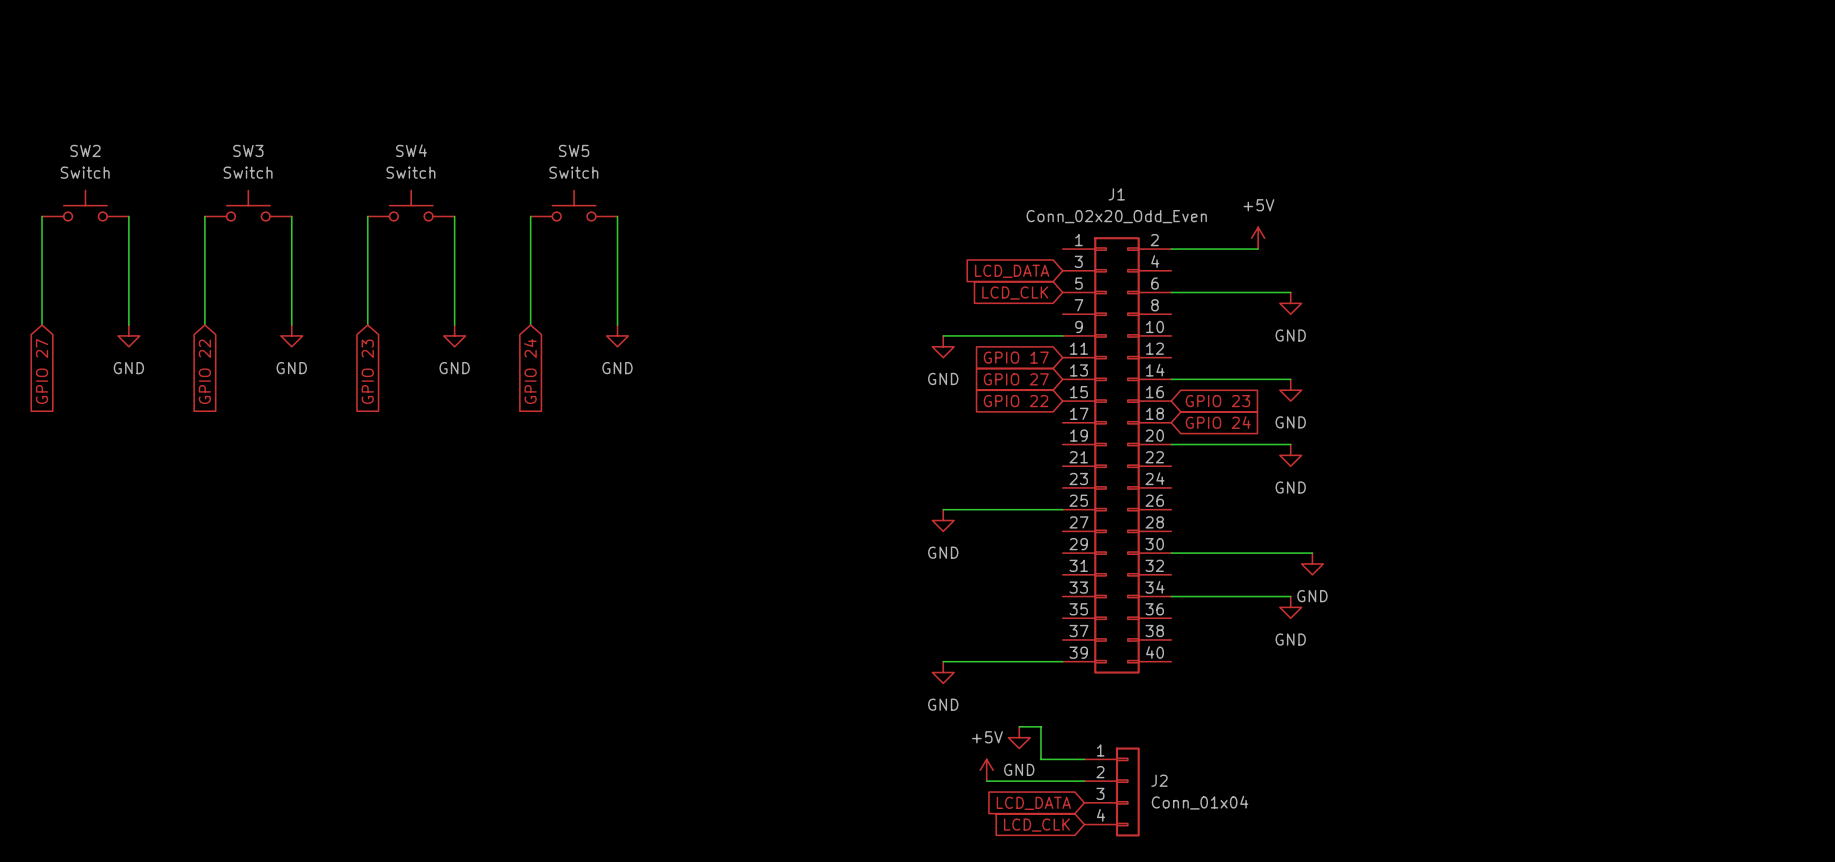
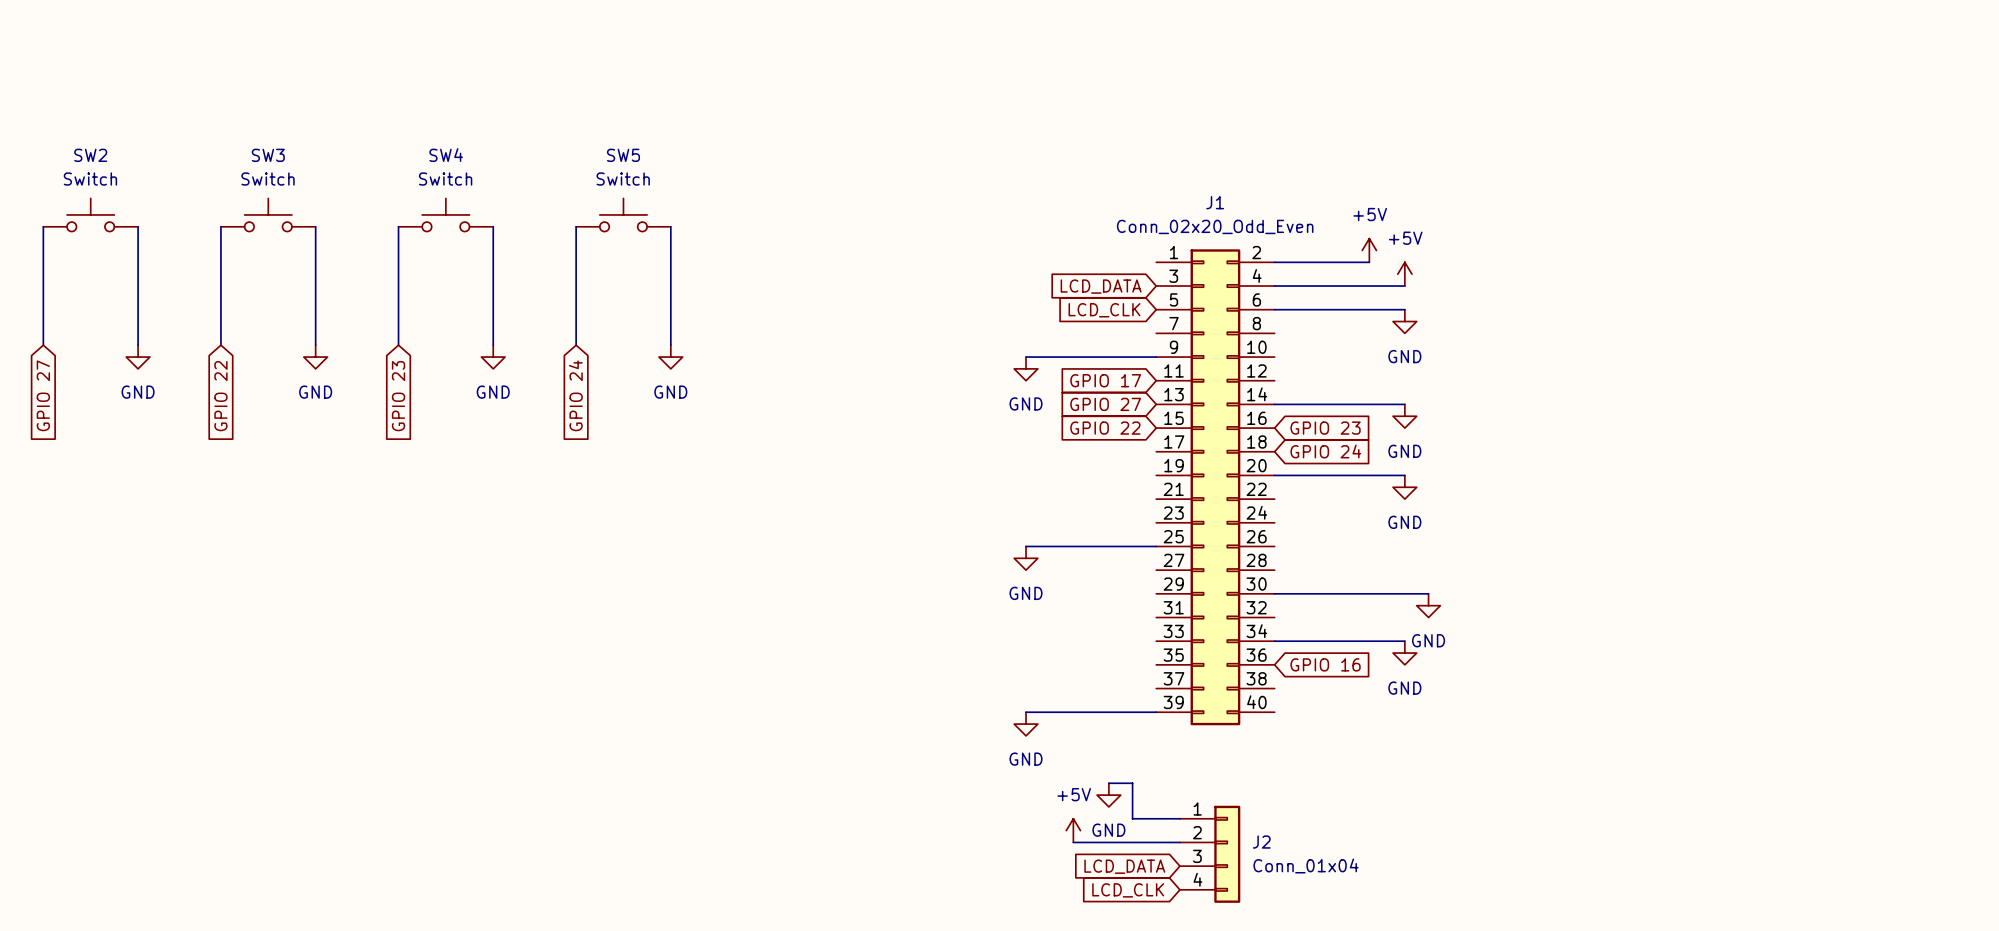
power symbol: none -> +5V (1404, 274)
wire: none -> (1274, 286) (1404, 286)
global label: none -> GPIO 16 (1325, 664)

